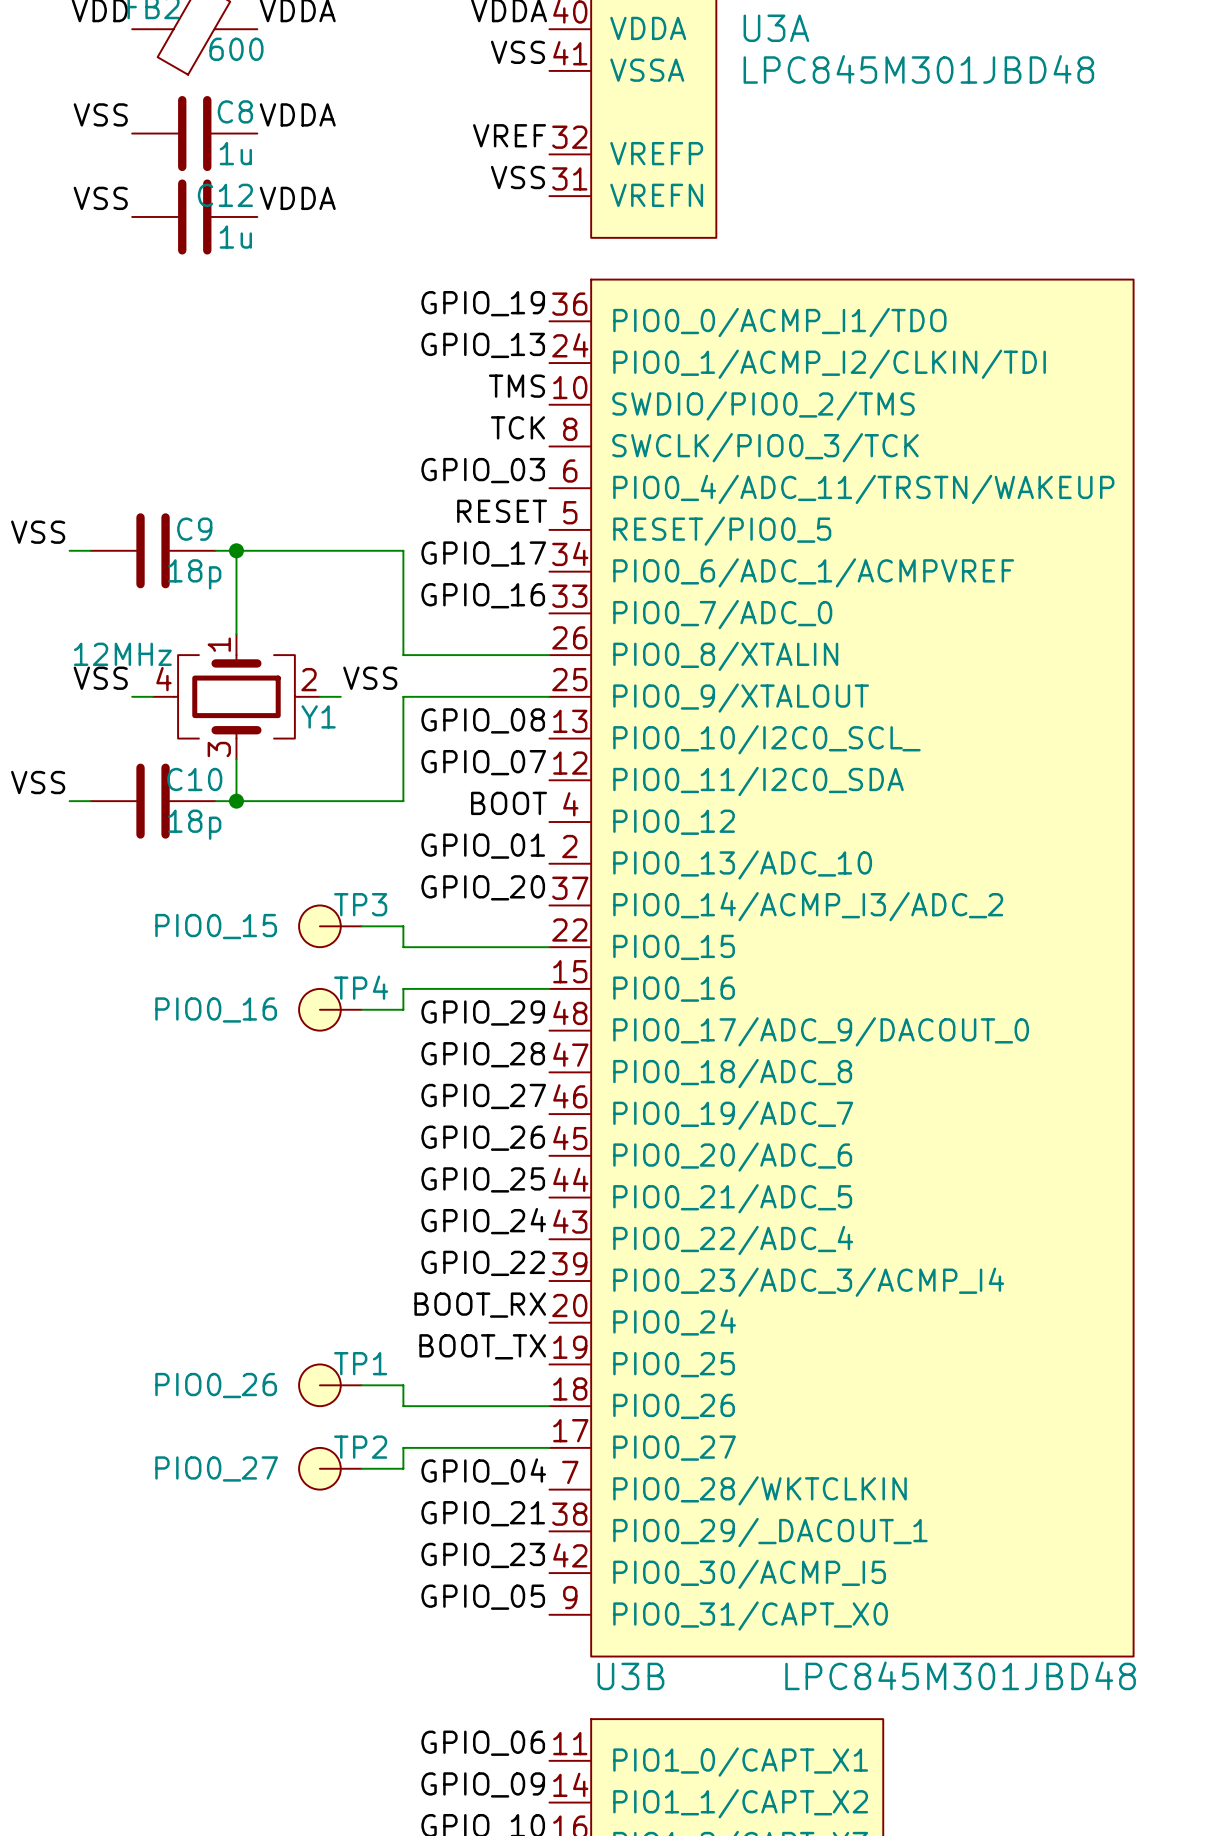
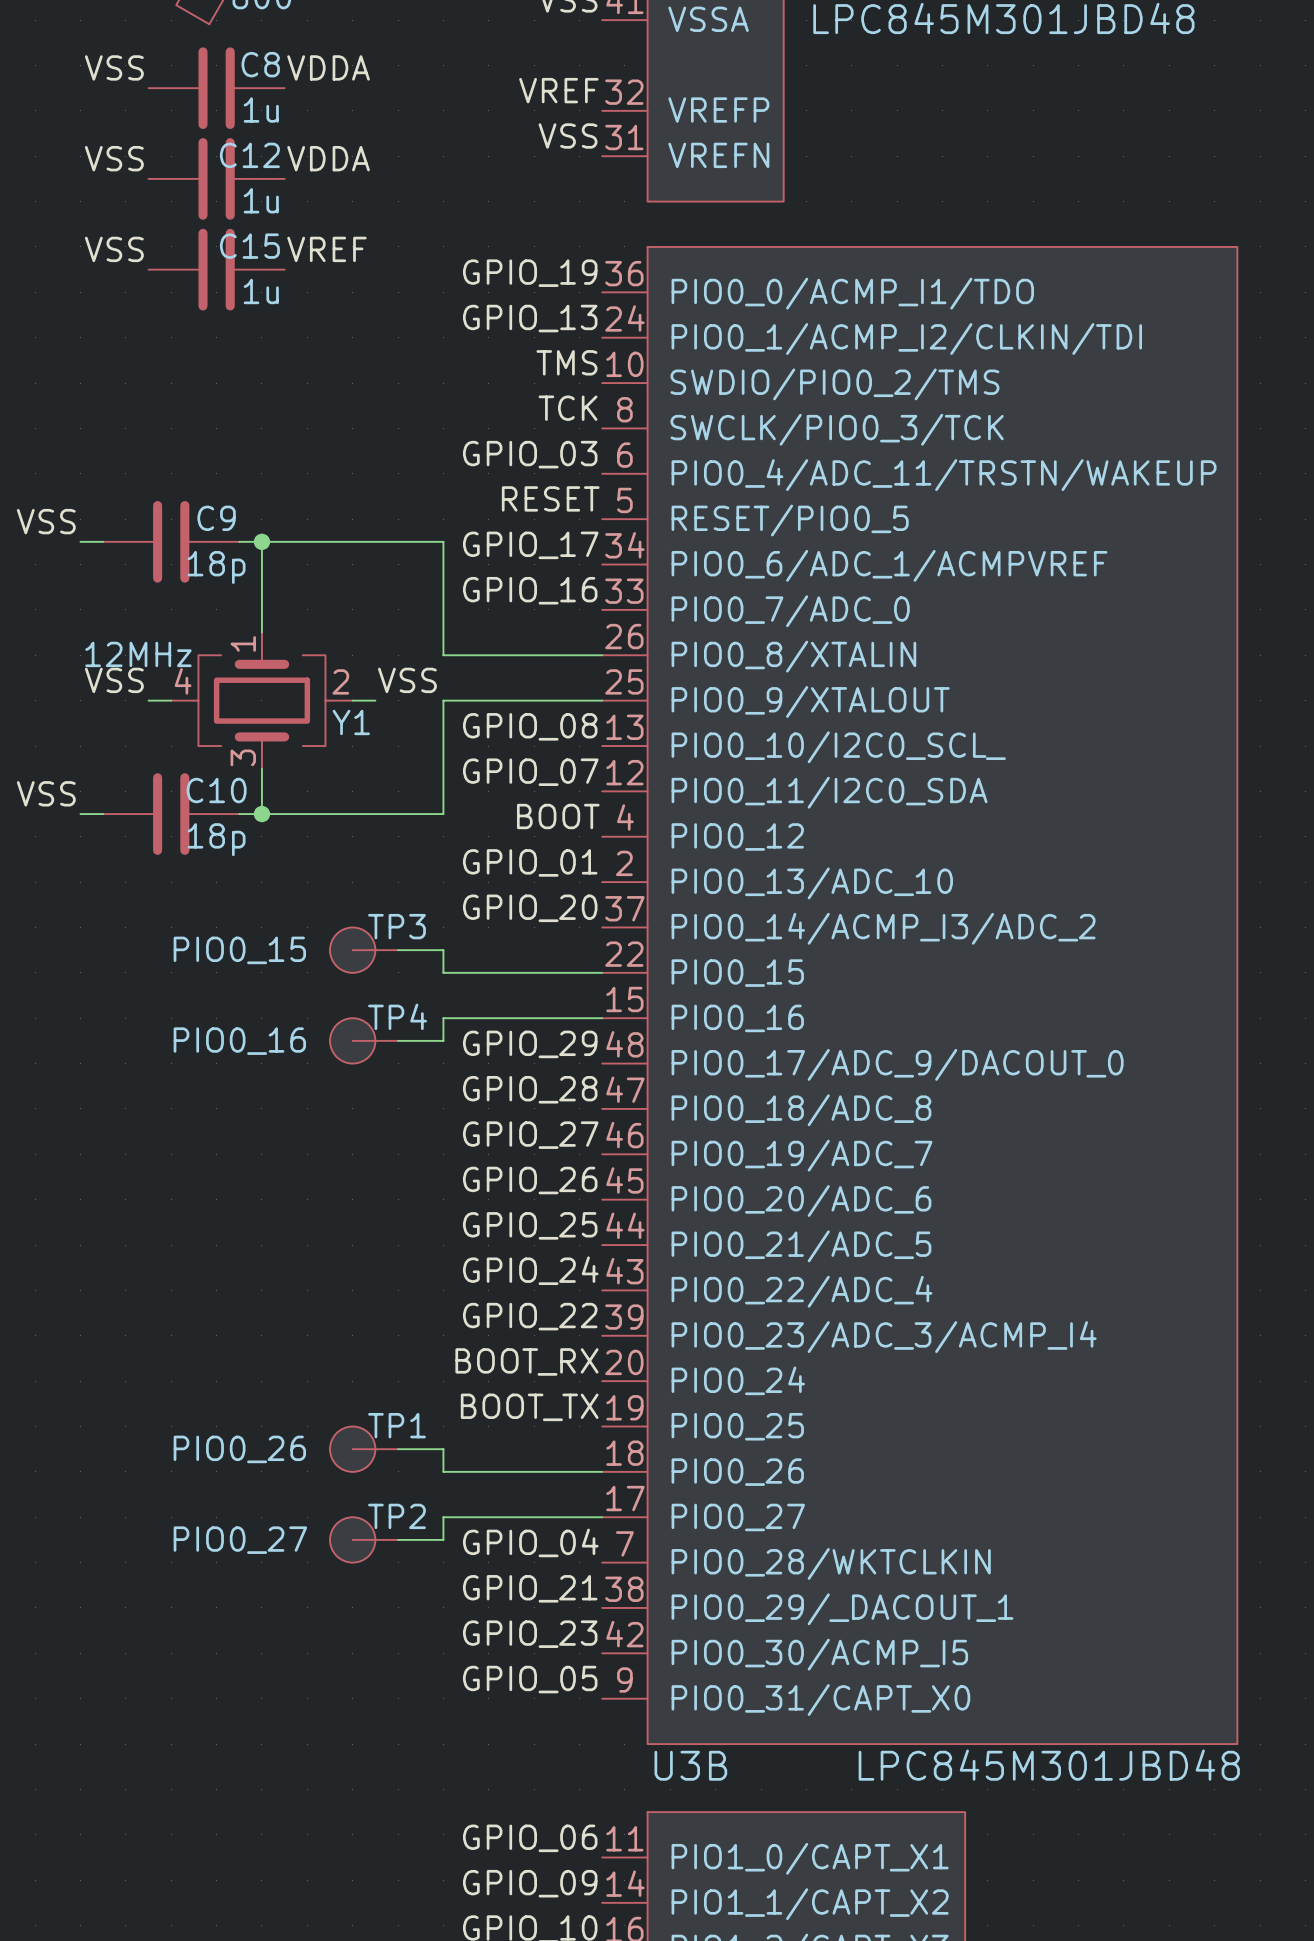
label: none -> VSS (114, 249)
label: none -> VREF (326, 249)
C15: none -> 1u (216, 269)

